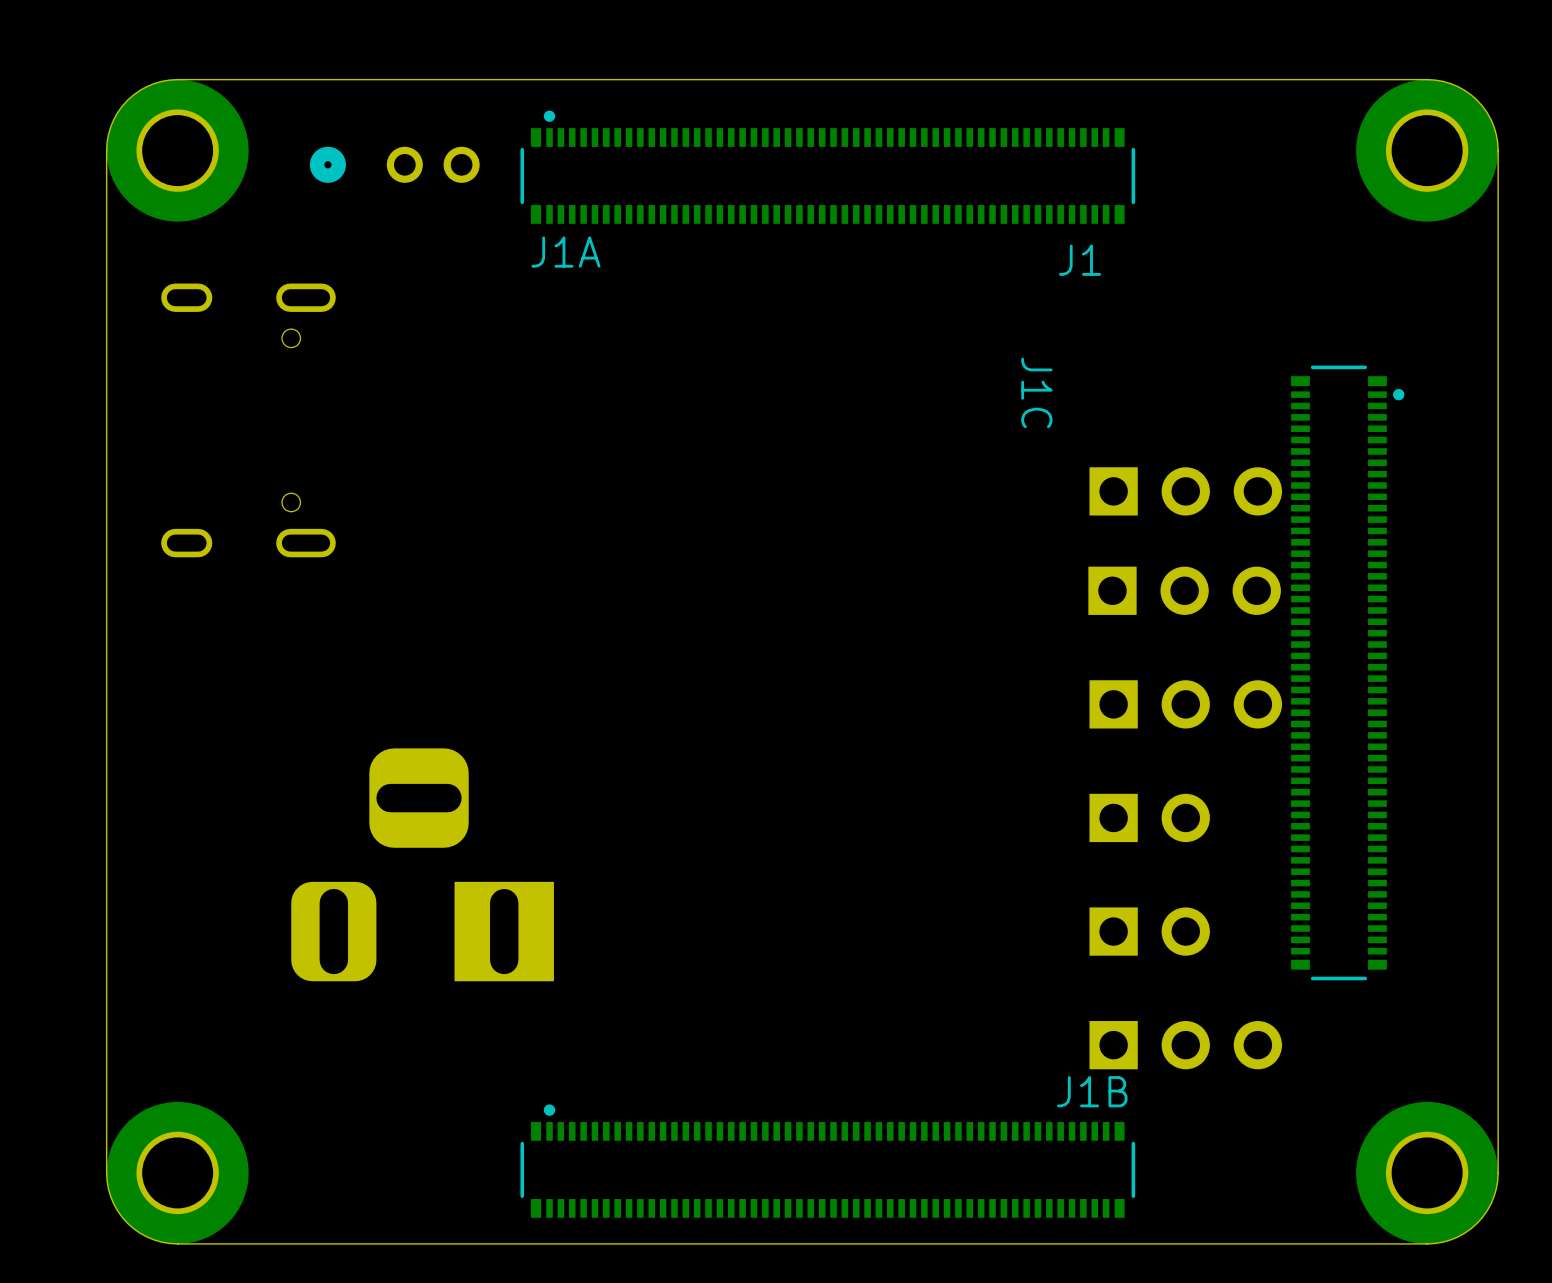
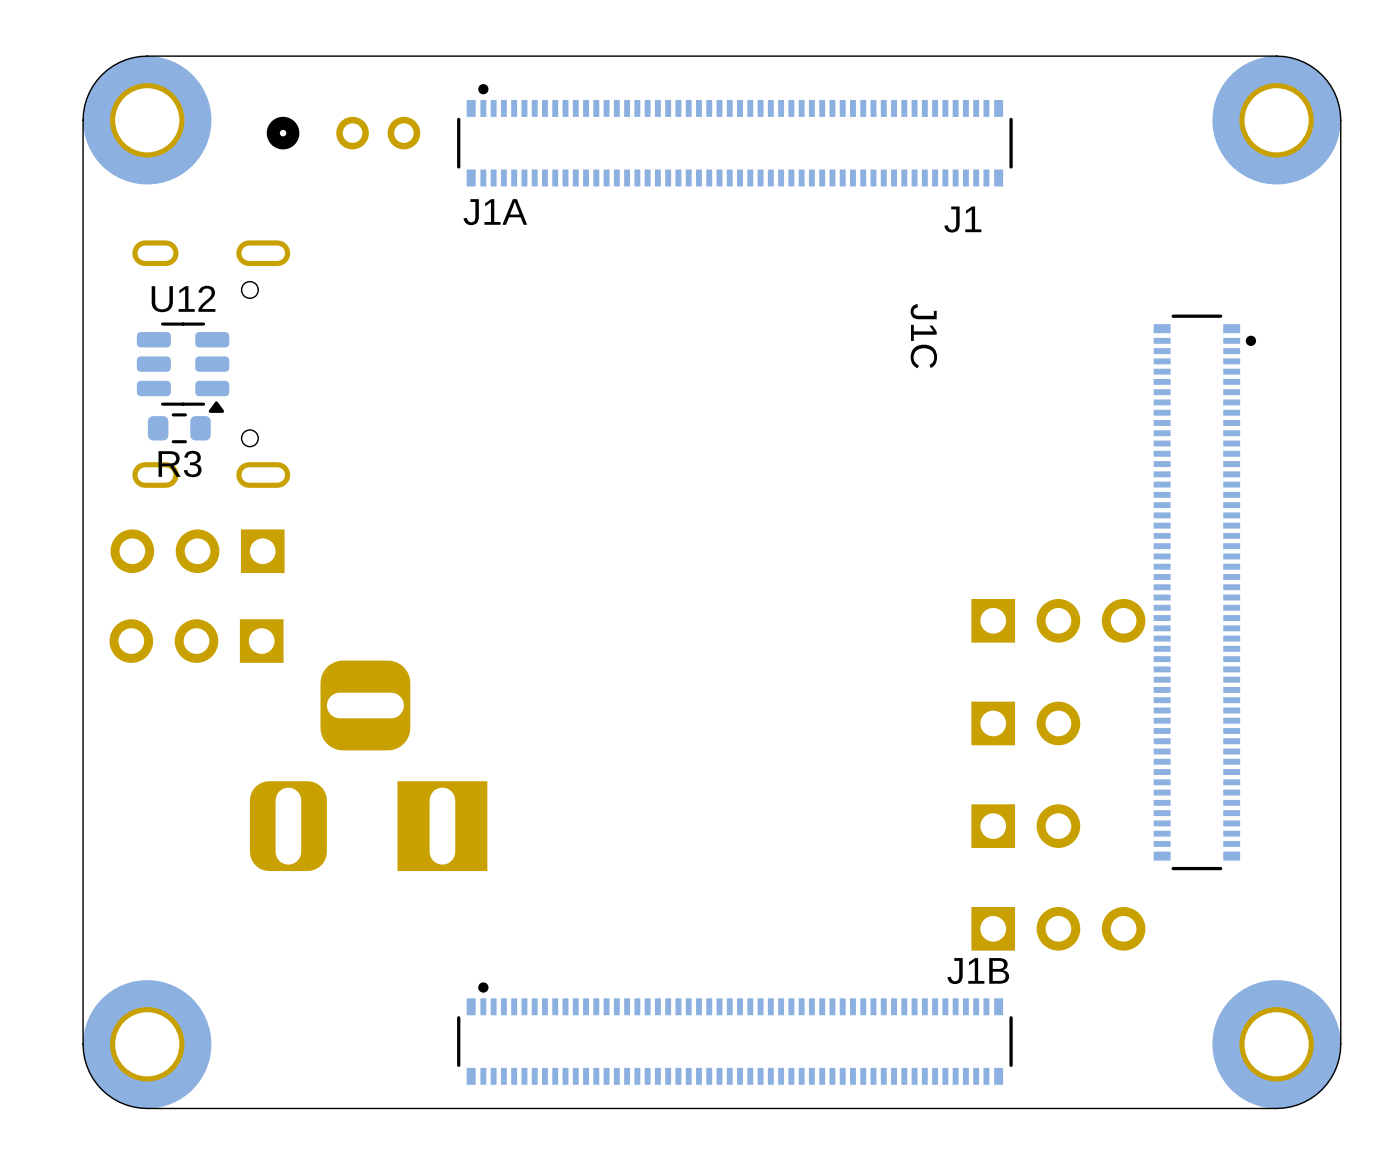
U12: none -> (183, 367)
R3: none -> (179, 428)
part: (1185, 491) -> none
part: (1184, 590) -> none
part: none -> (197, 551)
part: none -> (196, 641)

